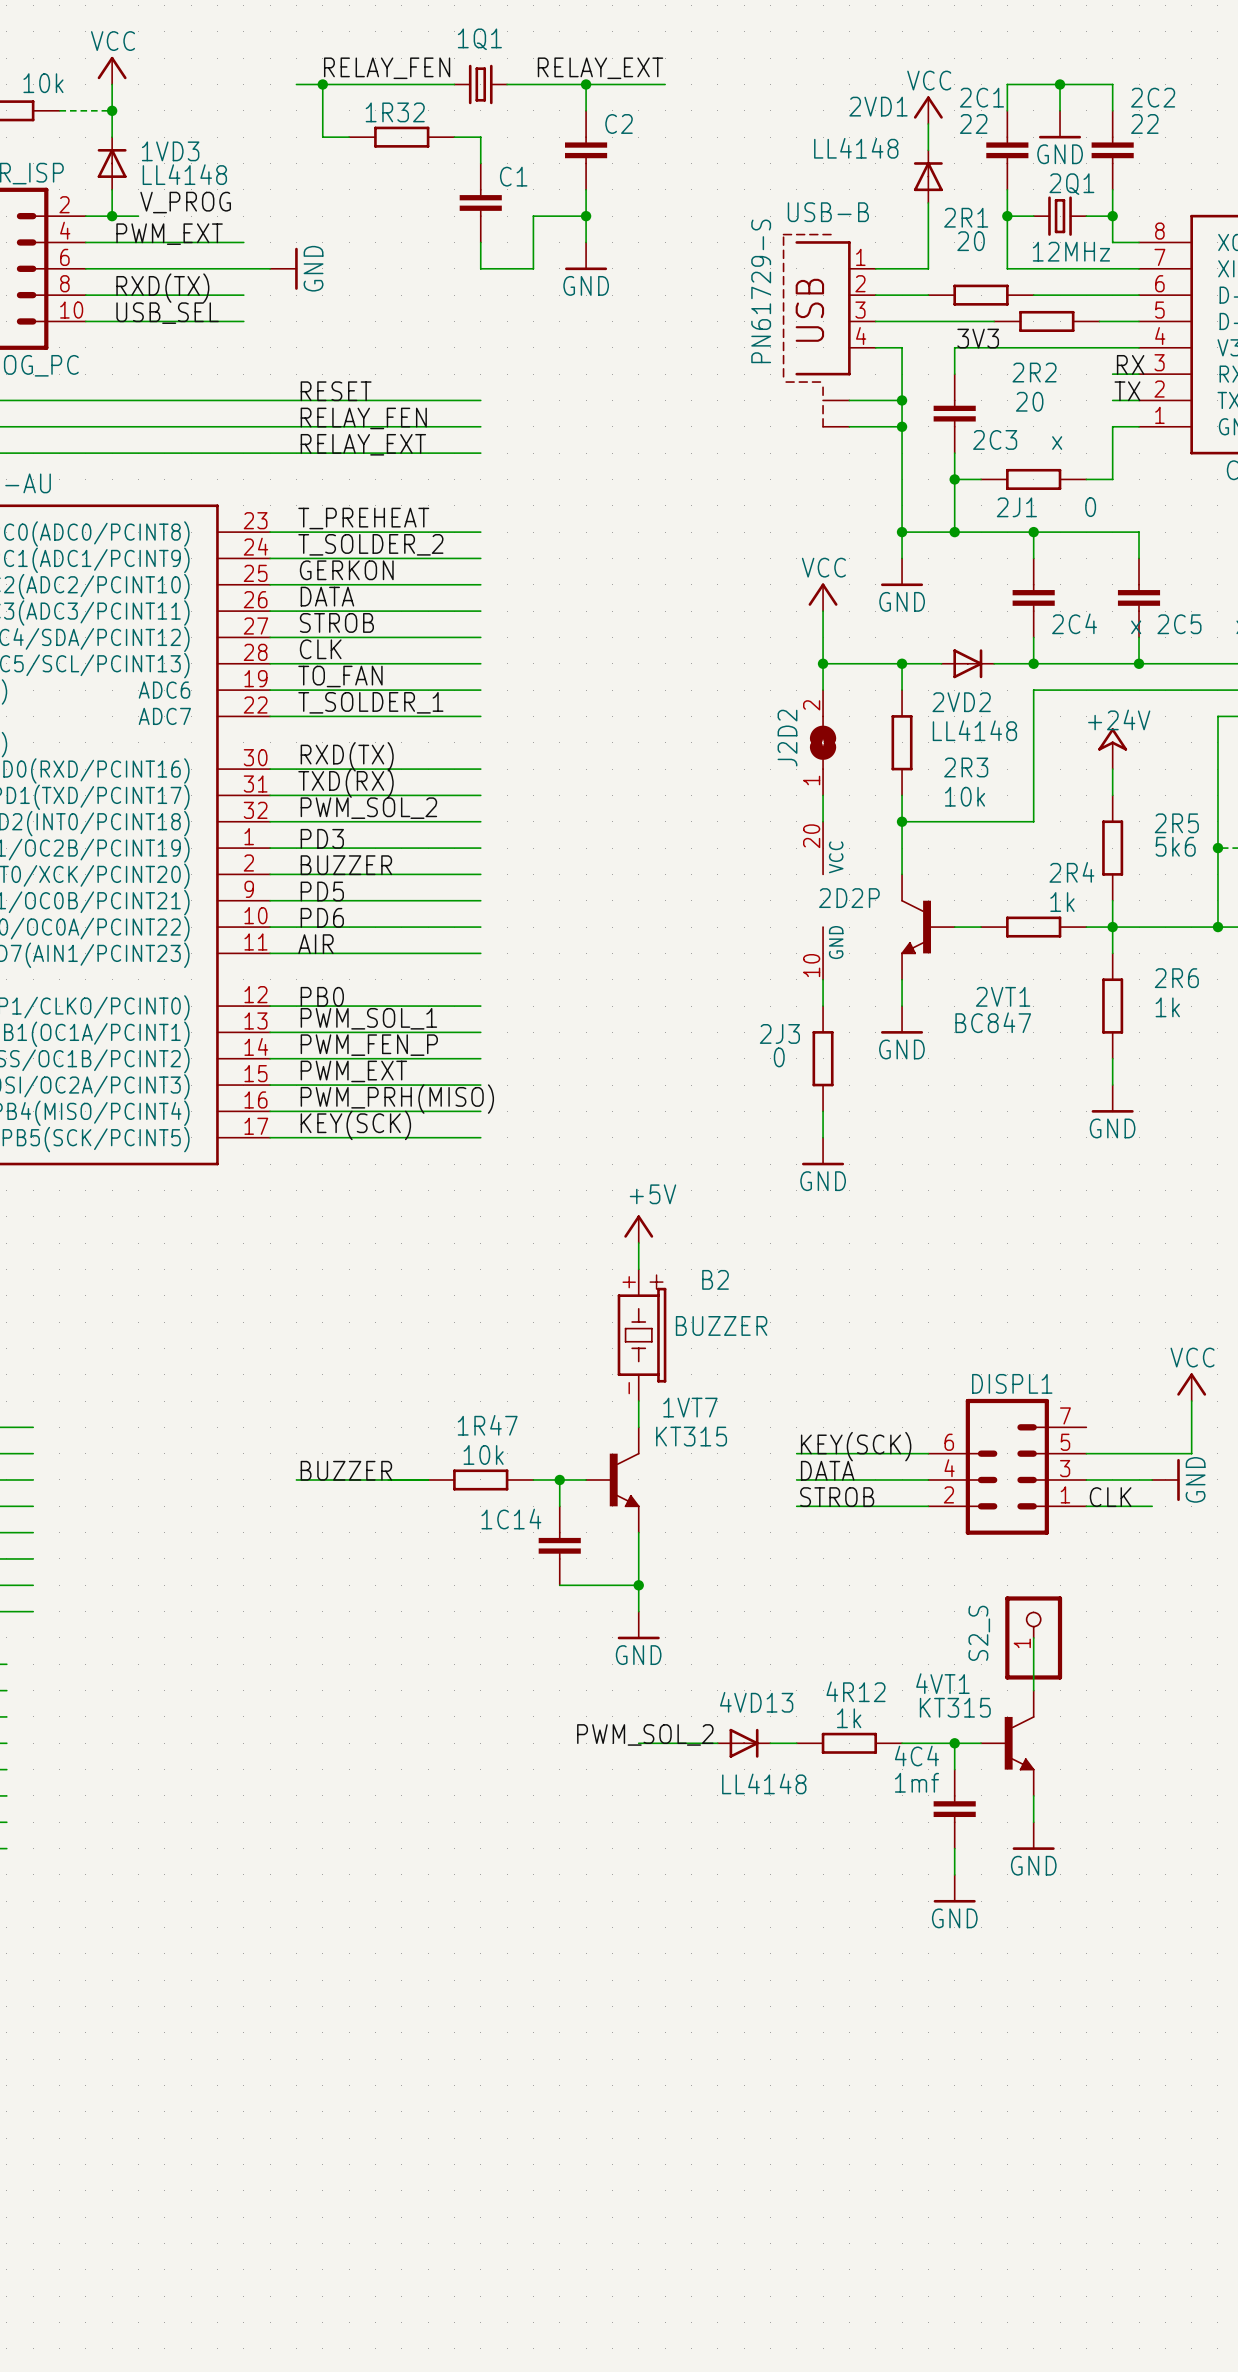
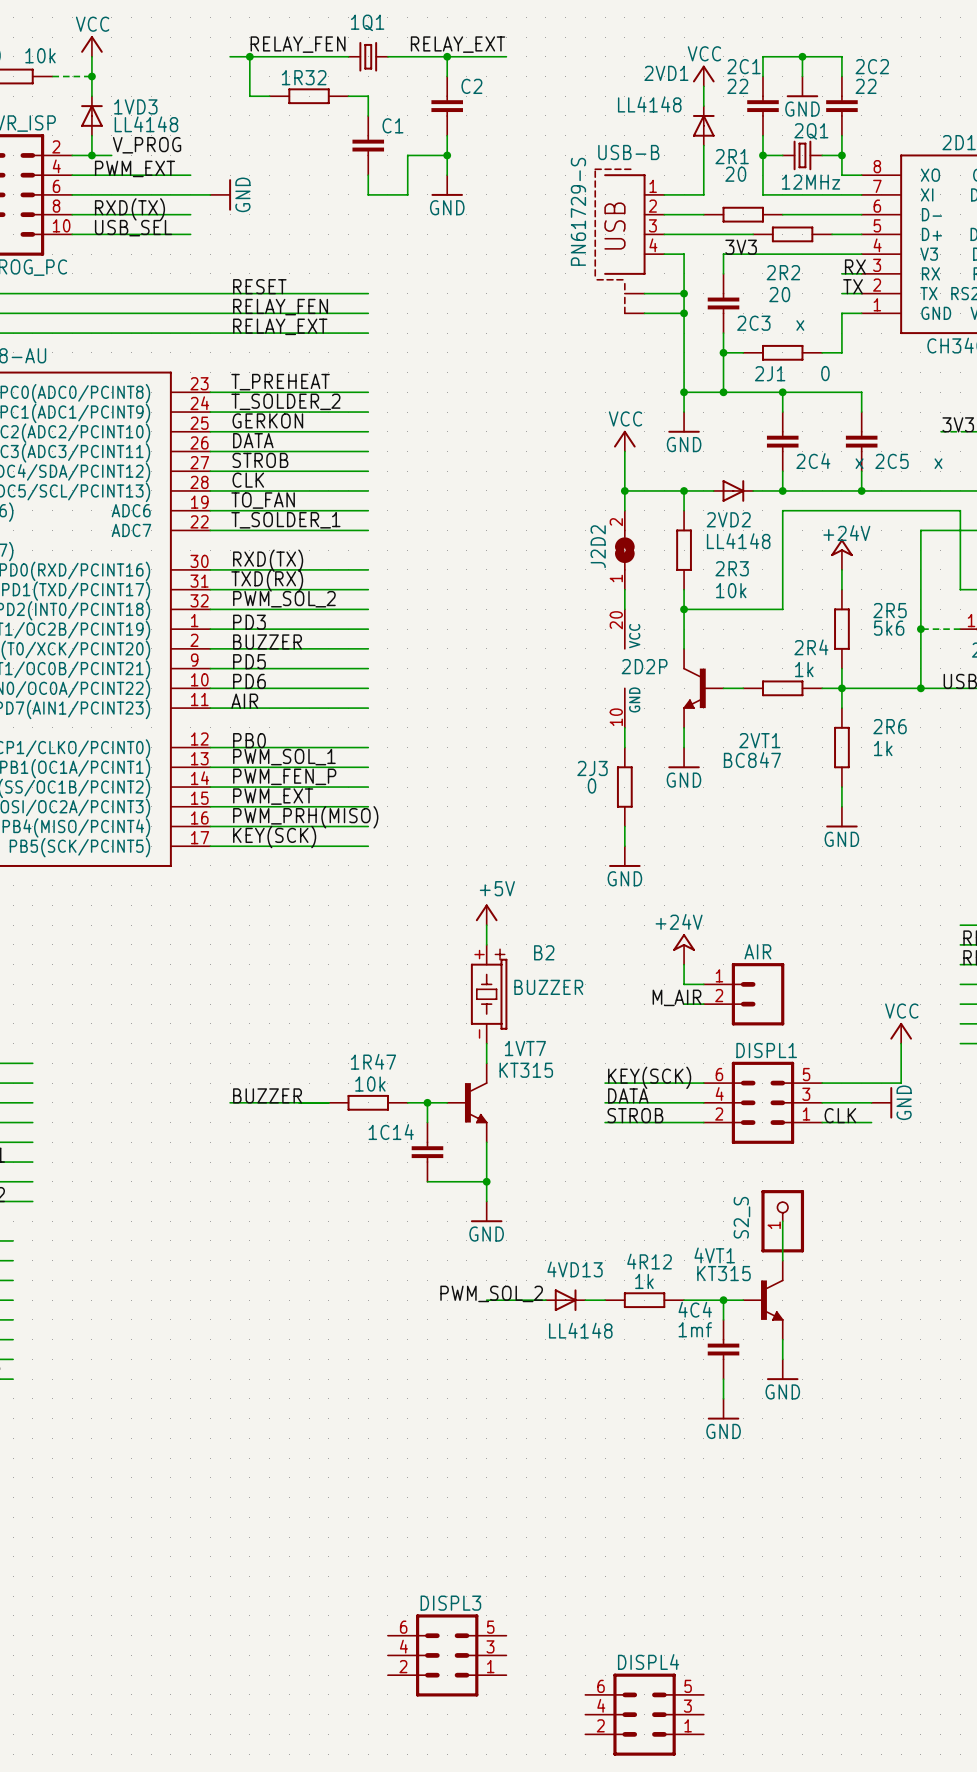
power symbol: none -> +24V (684, 949)
wire: none -> (684, 964) (684, 984) (703, 984)
AIR: none -> (744, 994)
label: none -> M_AIR (677, 997)
wire: none -> (684, 1004) (703, 1004)
DISPL1 symbol: [928, 1398, 1087, 1535] -> [703, 1061, 823, 1144]
DISPL3: none -> (447, 1655)
DISPL4: none -> (644, 1714)

